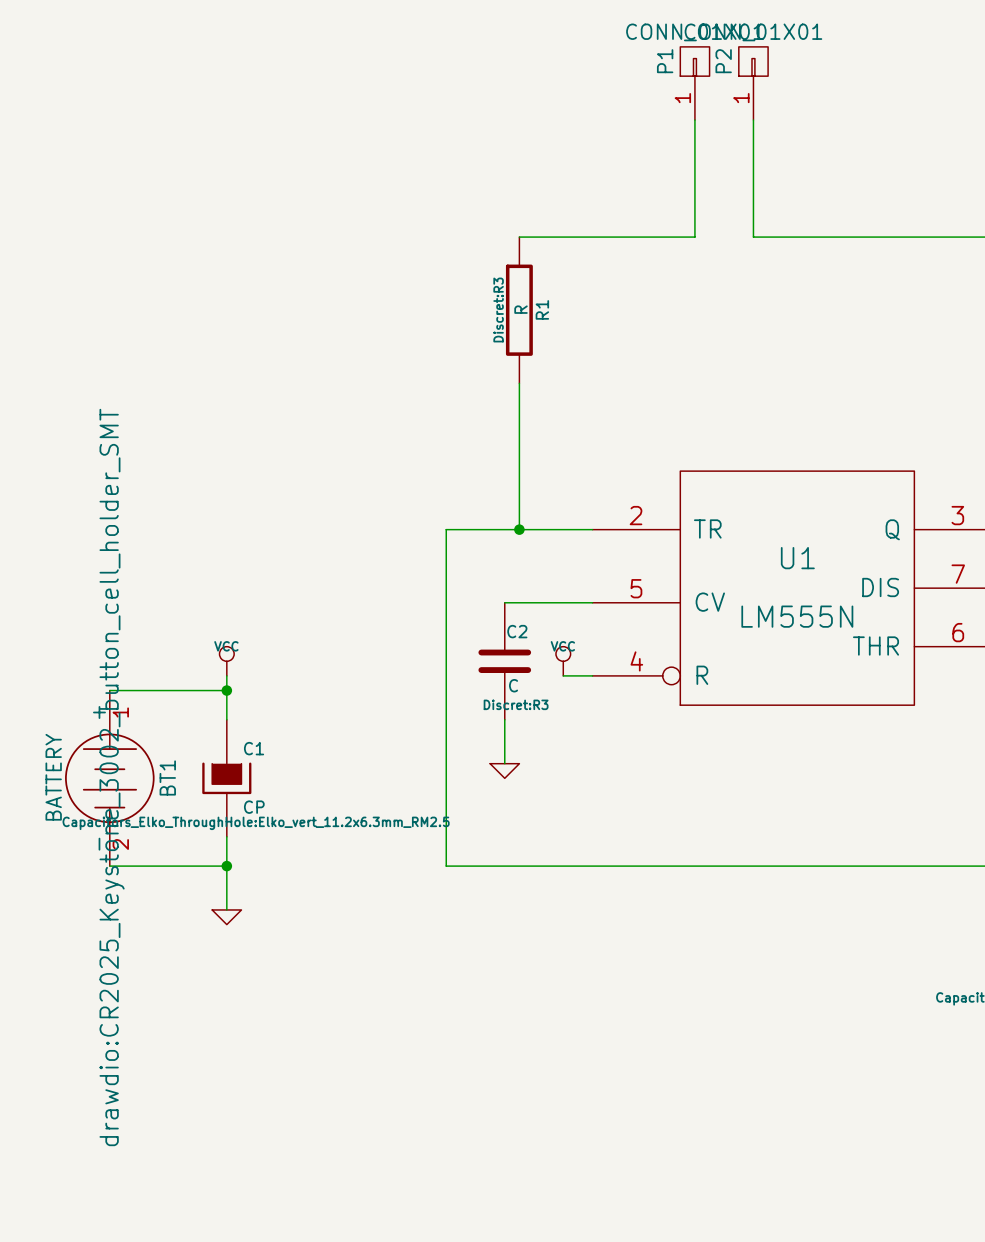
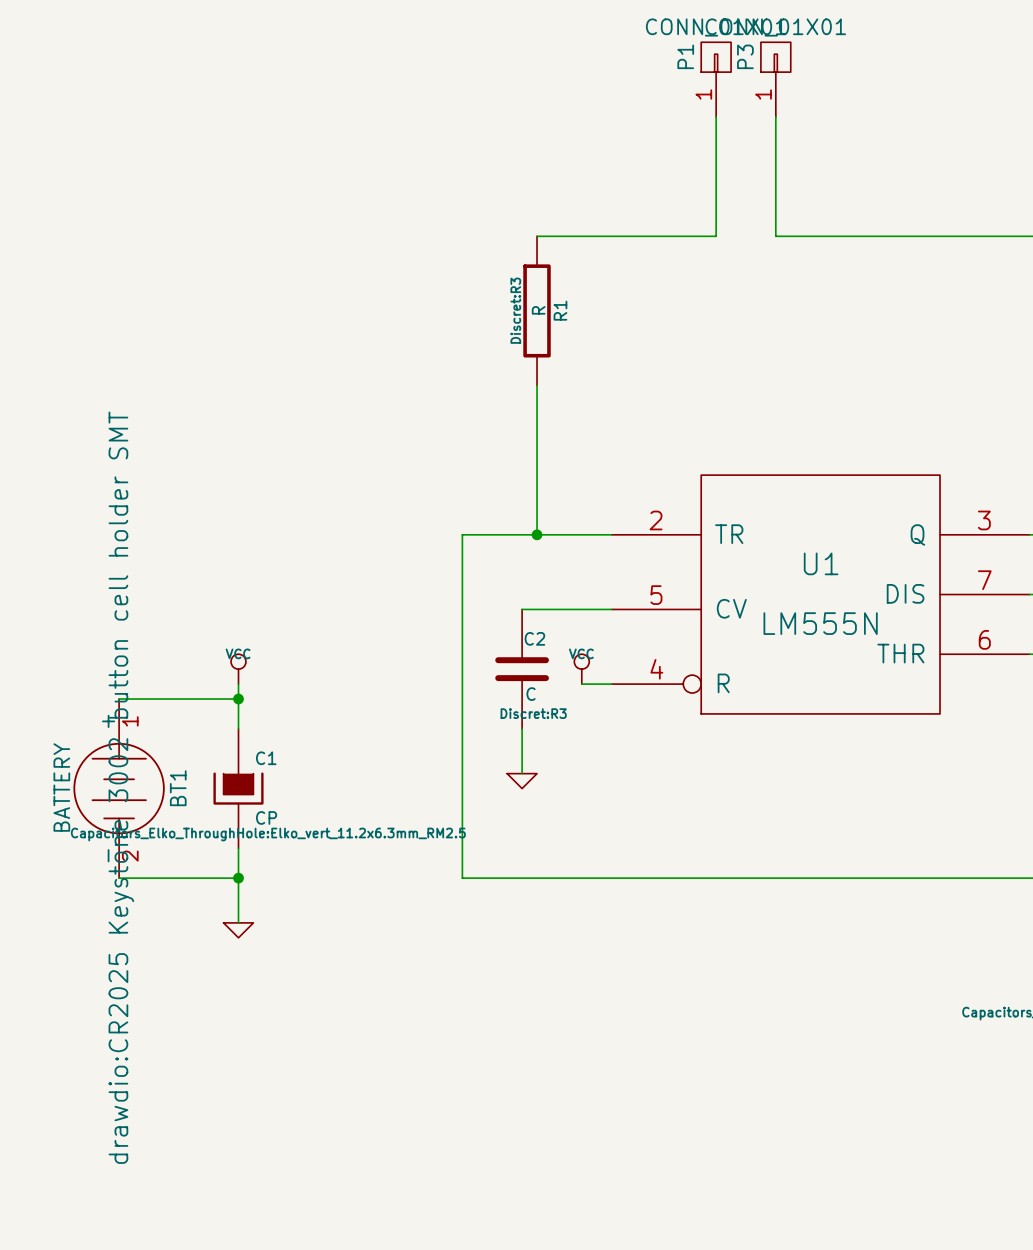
P2 name: P2 (723, 61) -> P3 (745, 56)
BT1 text: drawdio:CR2025_Keystone_3002_button_cell_holder_SMT (112, 777) -> drawdio:CR2025 Keystone 3002 button cell holder SMT (121, 787)

